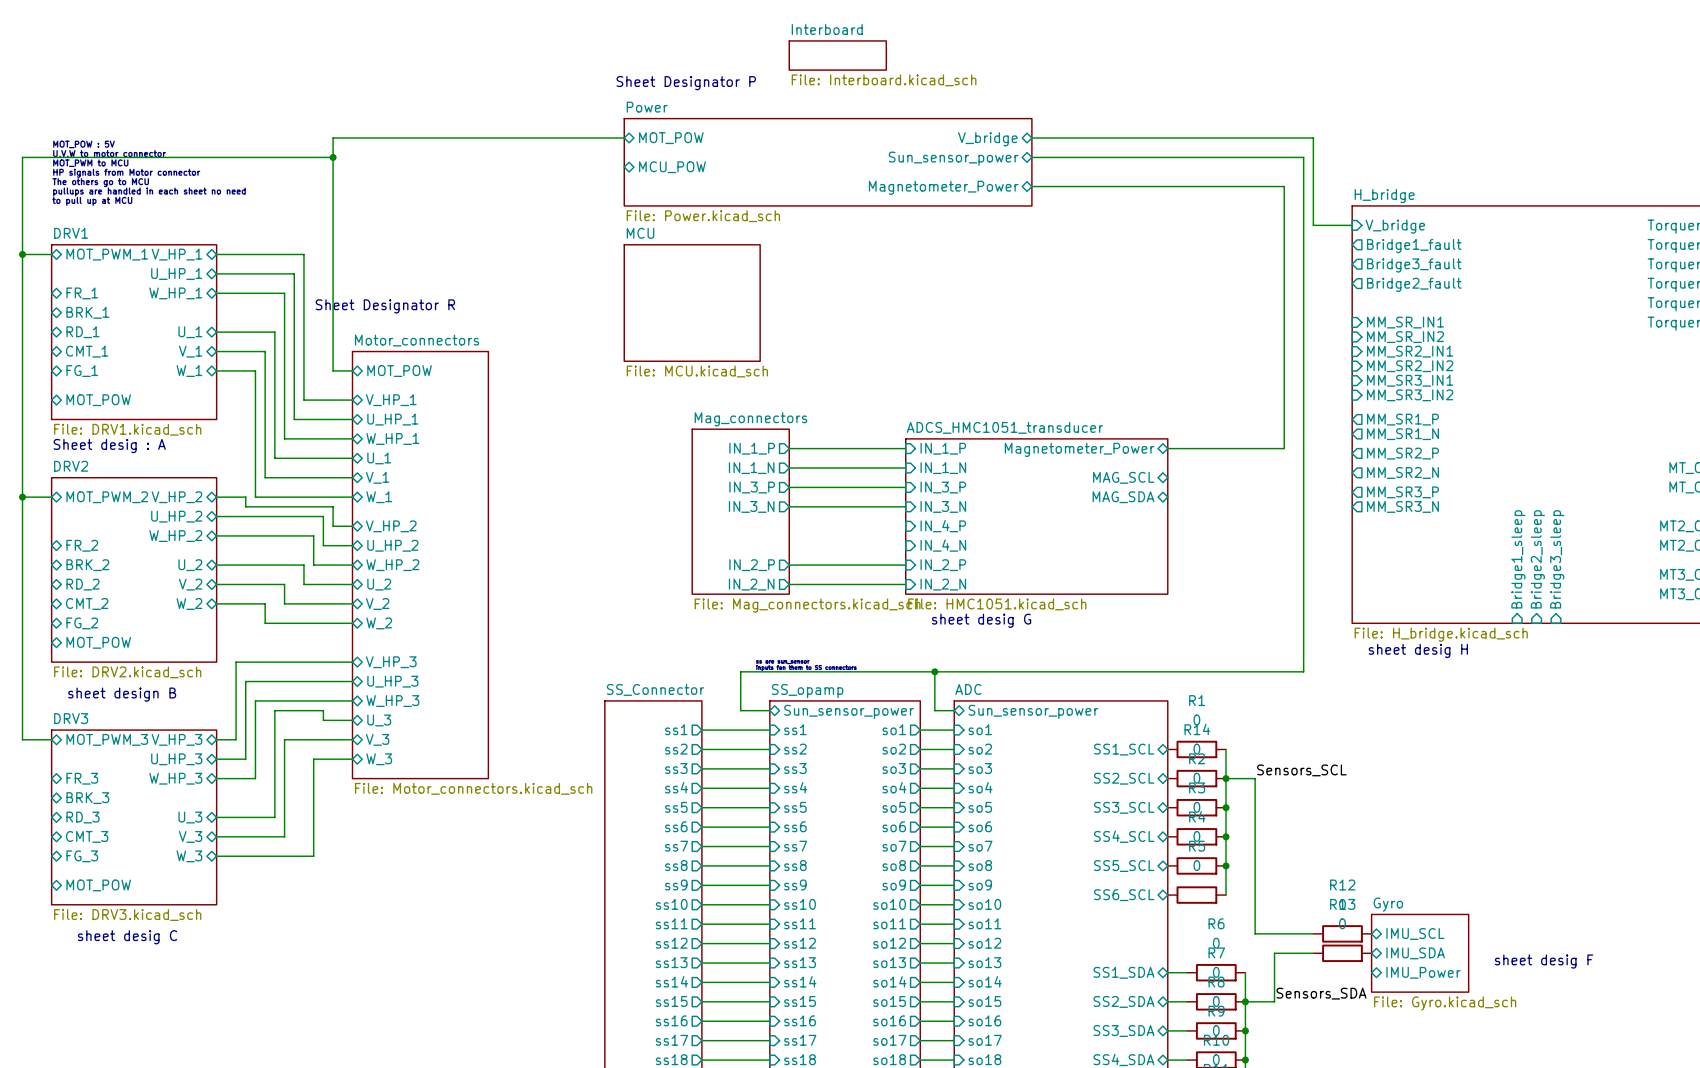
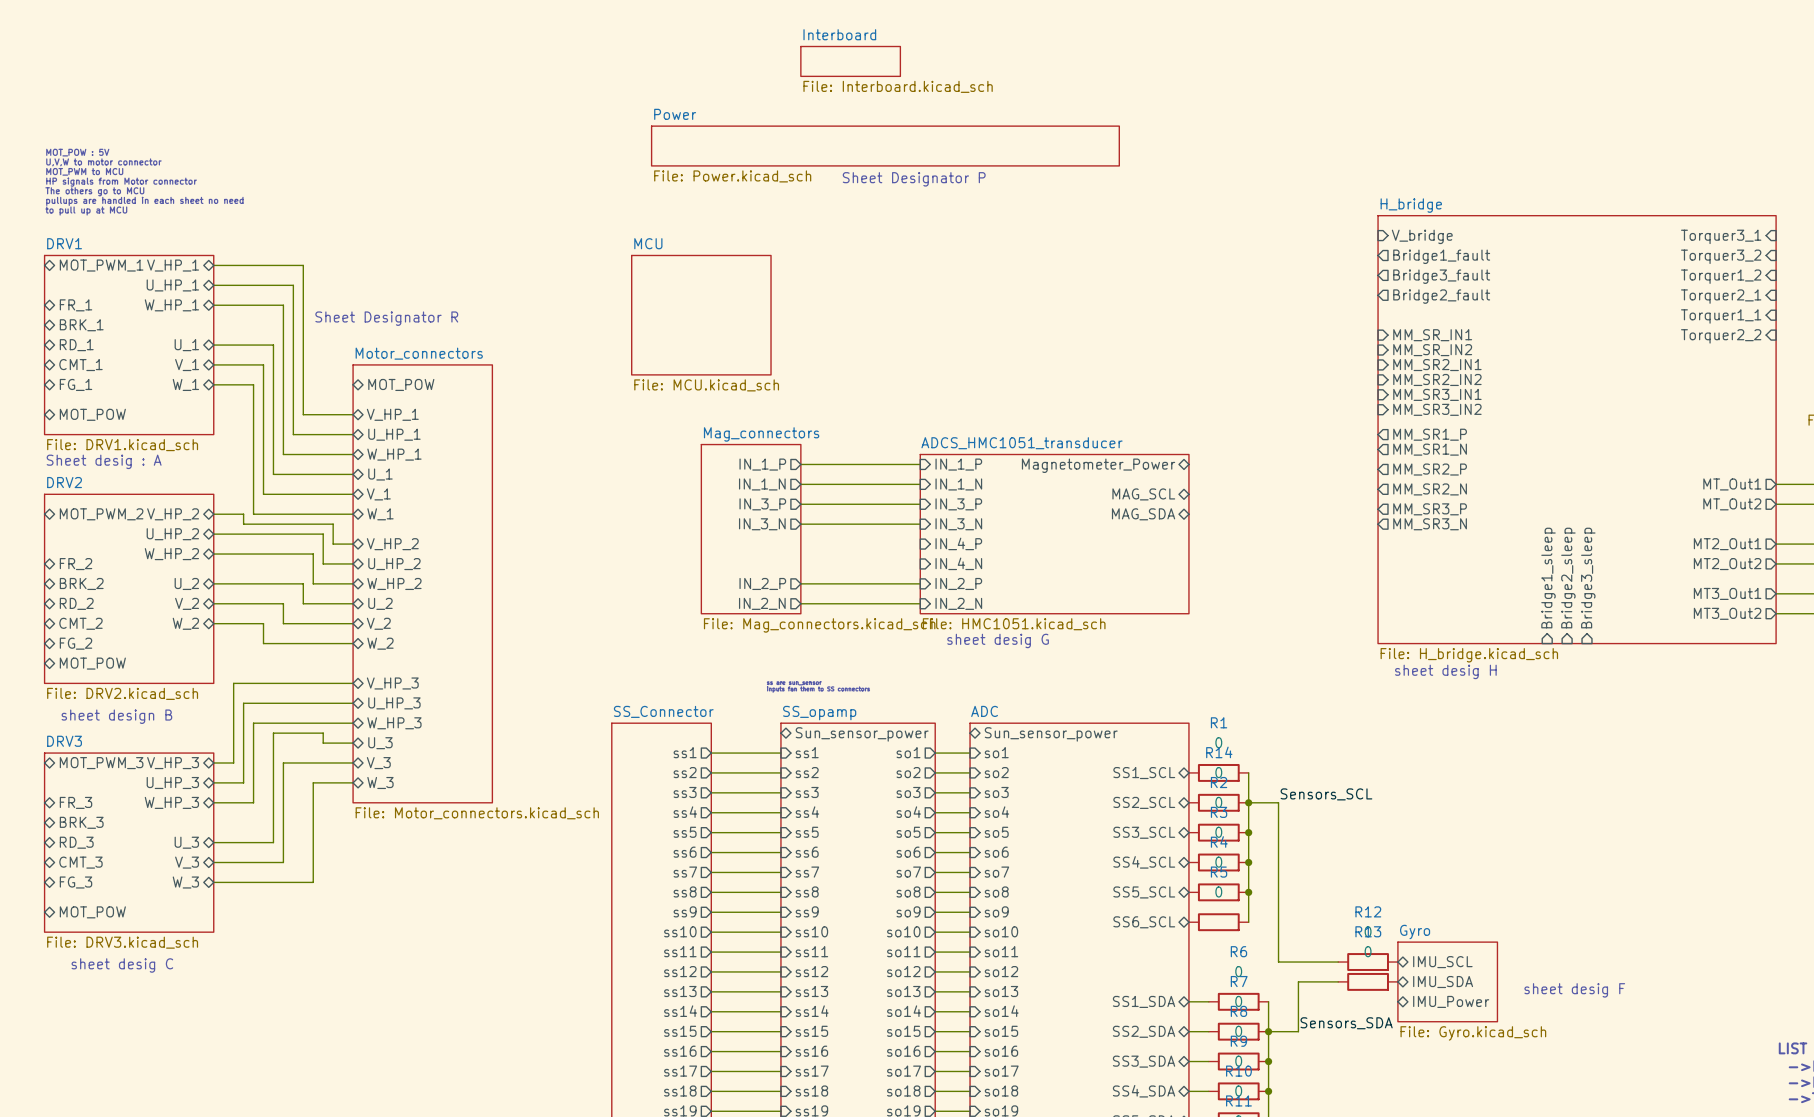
text: Sheet Designator P (686, 83) -> none
wire: (624, 138) (333, 138) (333, 370) (352, 370) -> none
sheet pin: MOT_POW (671, 138) -> none
sheet Power: none -> File: Power.kicad_sch (885, 146)
wire: (1031, 138) (1313, 138) (1313, 225) (1352, 225) -> none
sheet pin: V_bridge (987, 139) -> none
wire: (333, 157) (22, 157) (22, 739) (51, 739) -> none
junction: (333, 157) -> none
wire: (1031, 157) (1303, 157) (1303, 671) (740, 671) (740, 710) (769, 710) -> none
sheet pin: Sun_sensor_power (953, 158) -> none
sheet Power: File: Power.kicad_sch (828, 162) -> none
sheet pin: MCU_POW (672, 167) -> none
text: none -> Sheet Designator P (914, 179)
wire: (1031, 186) (1284, 186) (1284, 448) (1167, 448) -> none
sheet pin: Magnetometer_Power (943, 187) -> none
wire: (22, 254) (51, 254) -> none
junction: (22, 254) -> none
wire: (22, 497) (51, 497) -> none
junction: (22, 497) -> none
wire: (934, 671) (934, 710) (954, 710) -> none
junction: (934, 671) -> none

